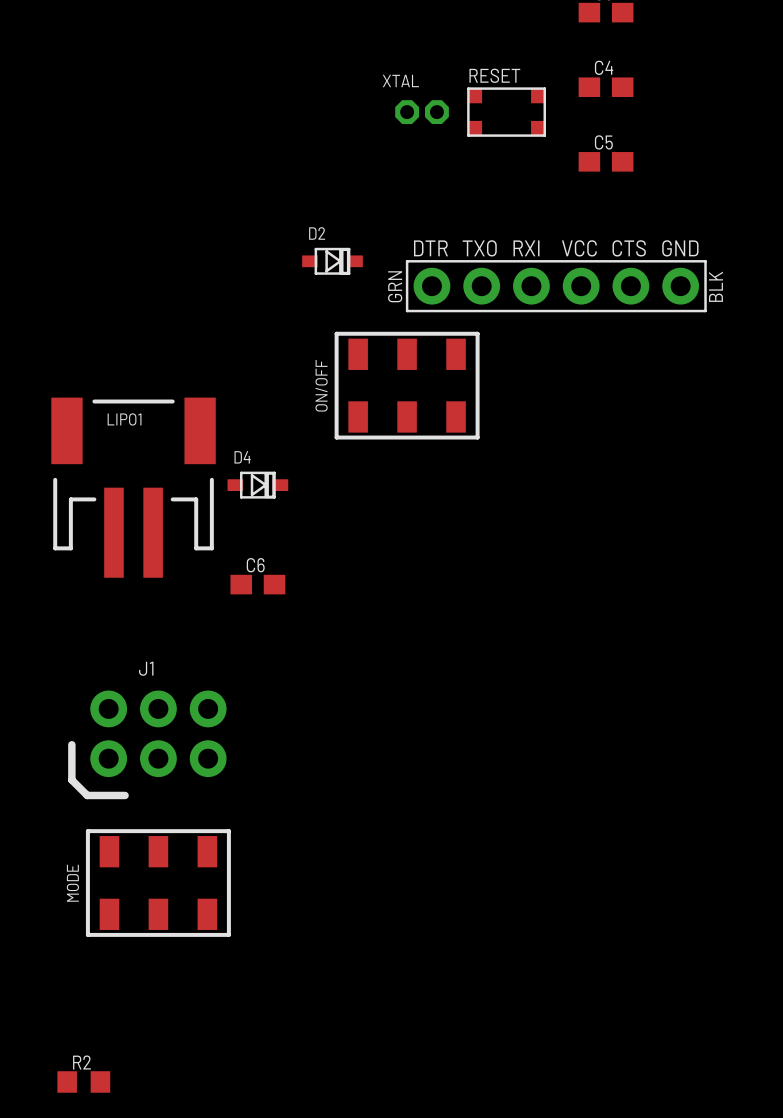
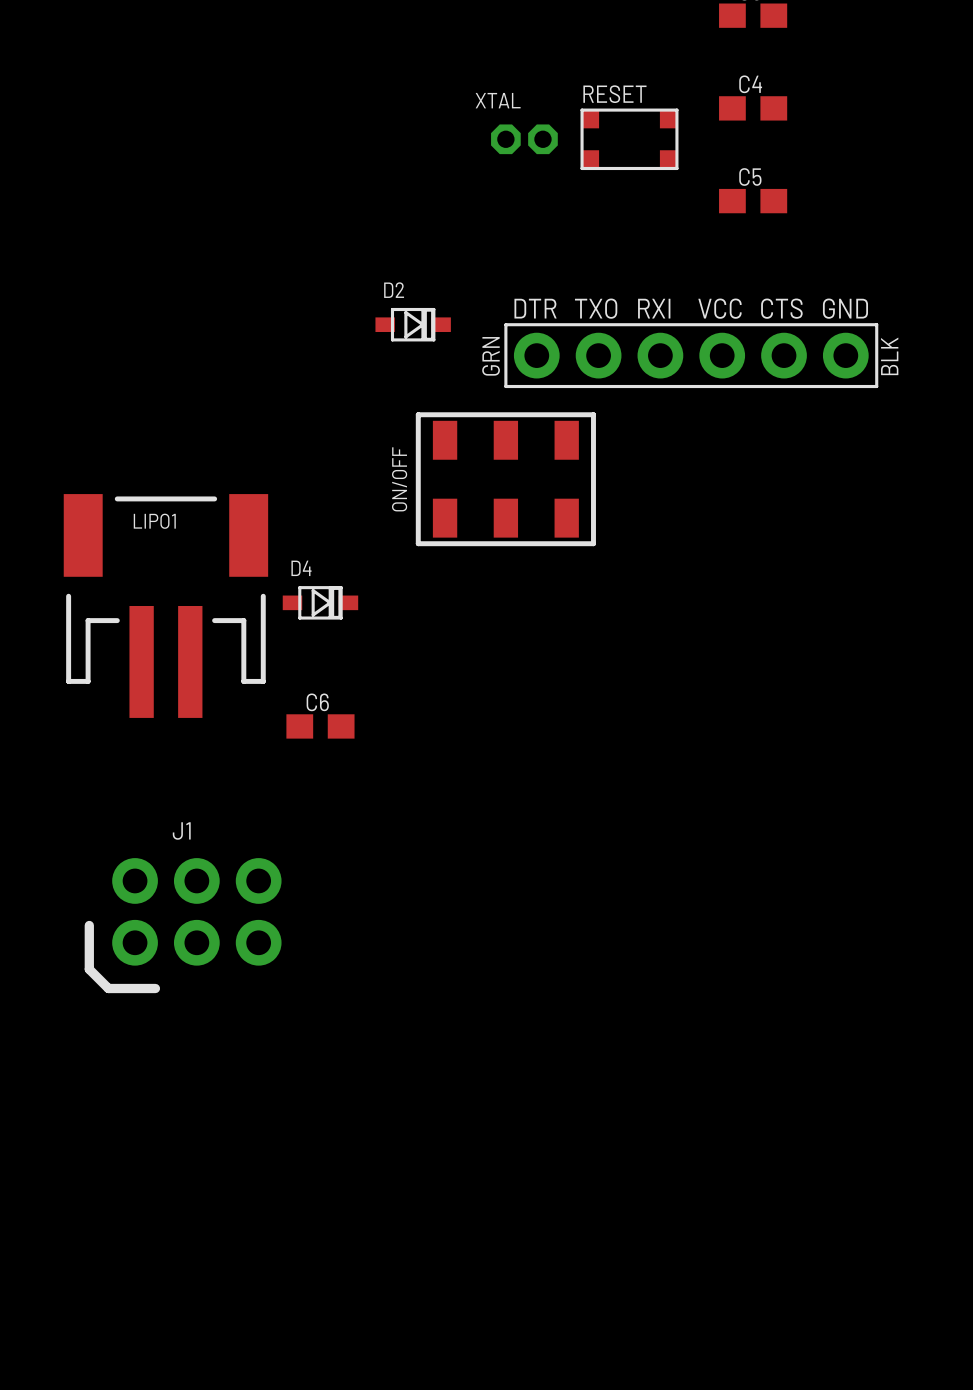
MODE: (158, 883) -> none
R2: (83, 1081) -> none

